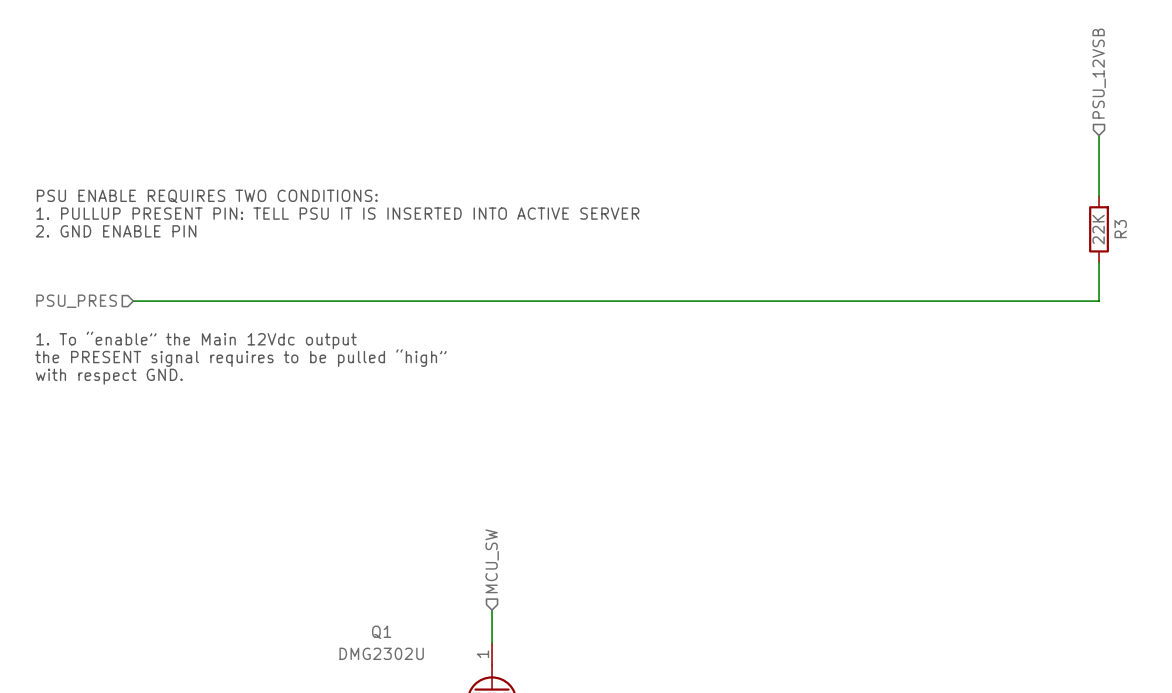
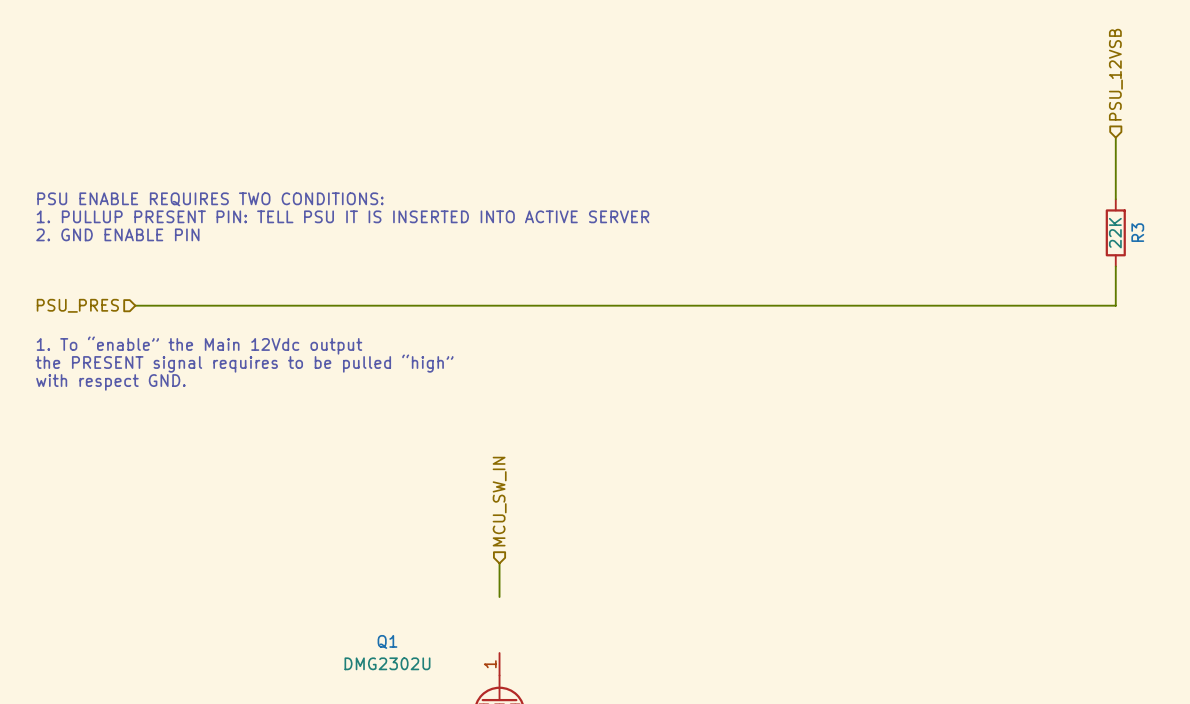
hierarchical label: MCU_SW (492, 561) -> MCU_SW_IN (499, 501)
wire: (492, 610) (492, 643) -> (499, 563) (499, 597)

